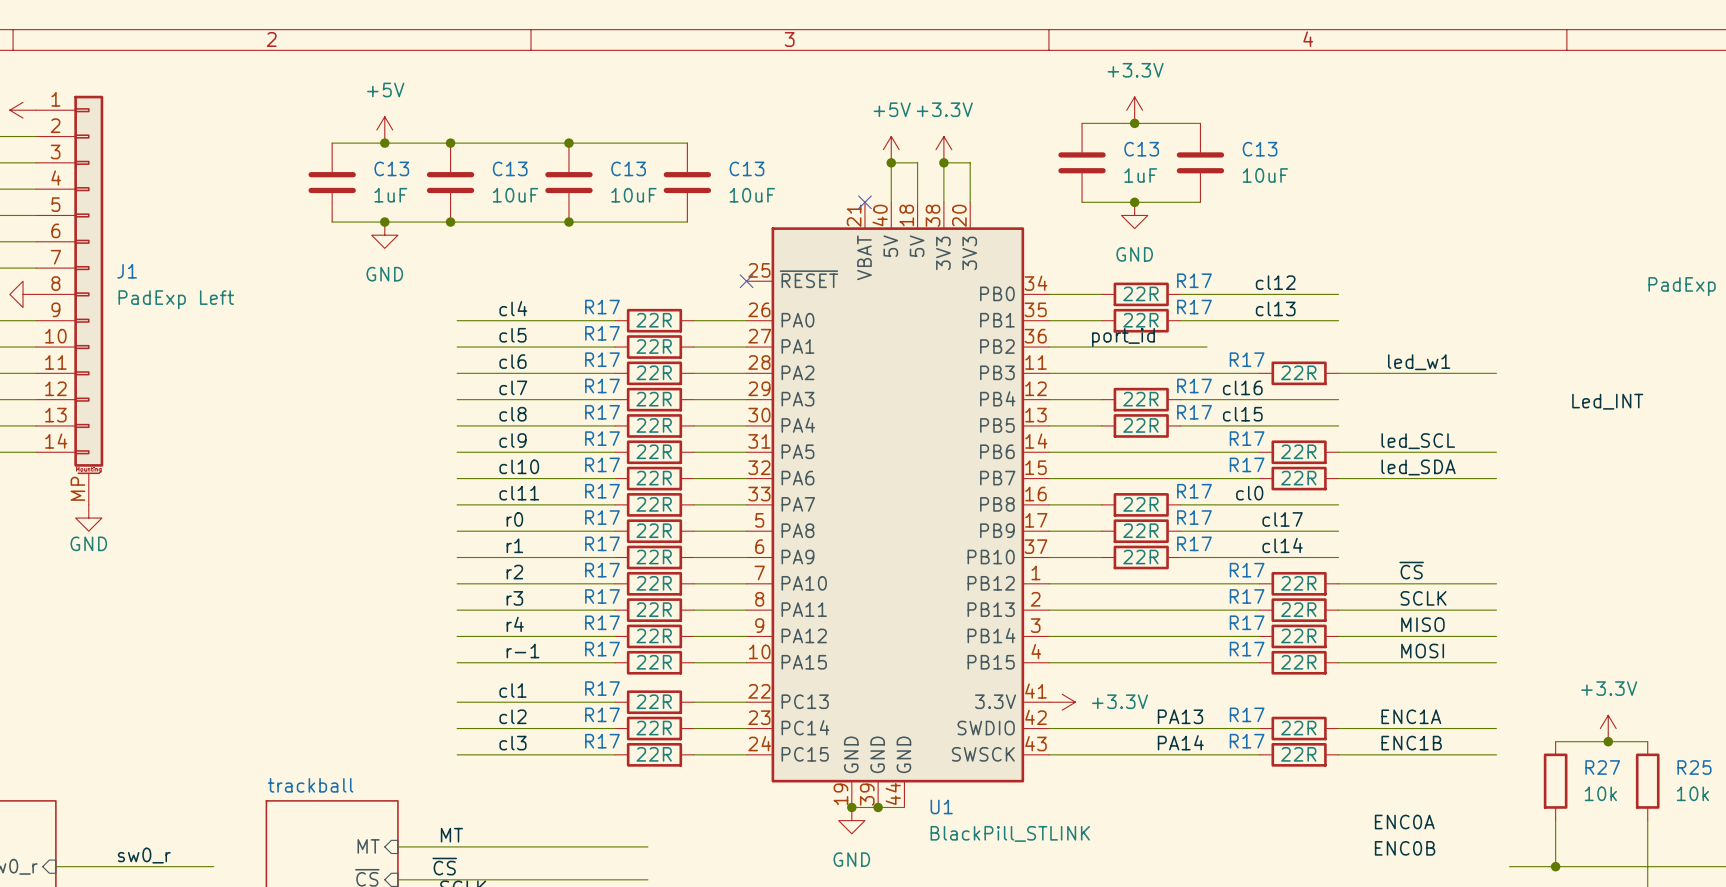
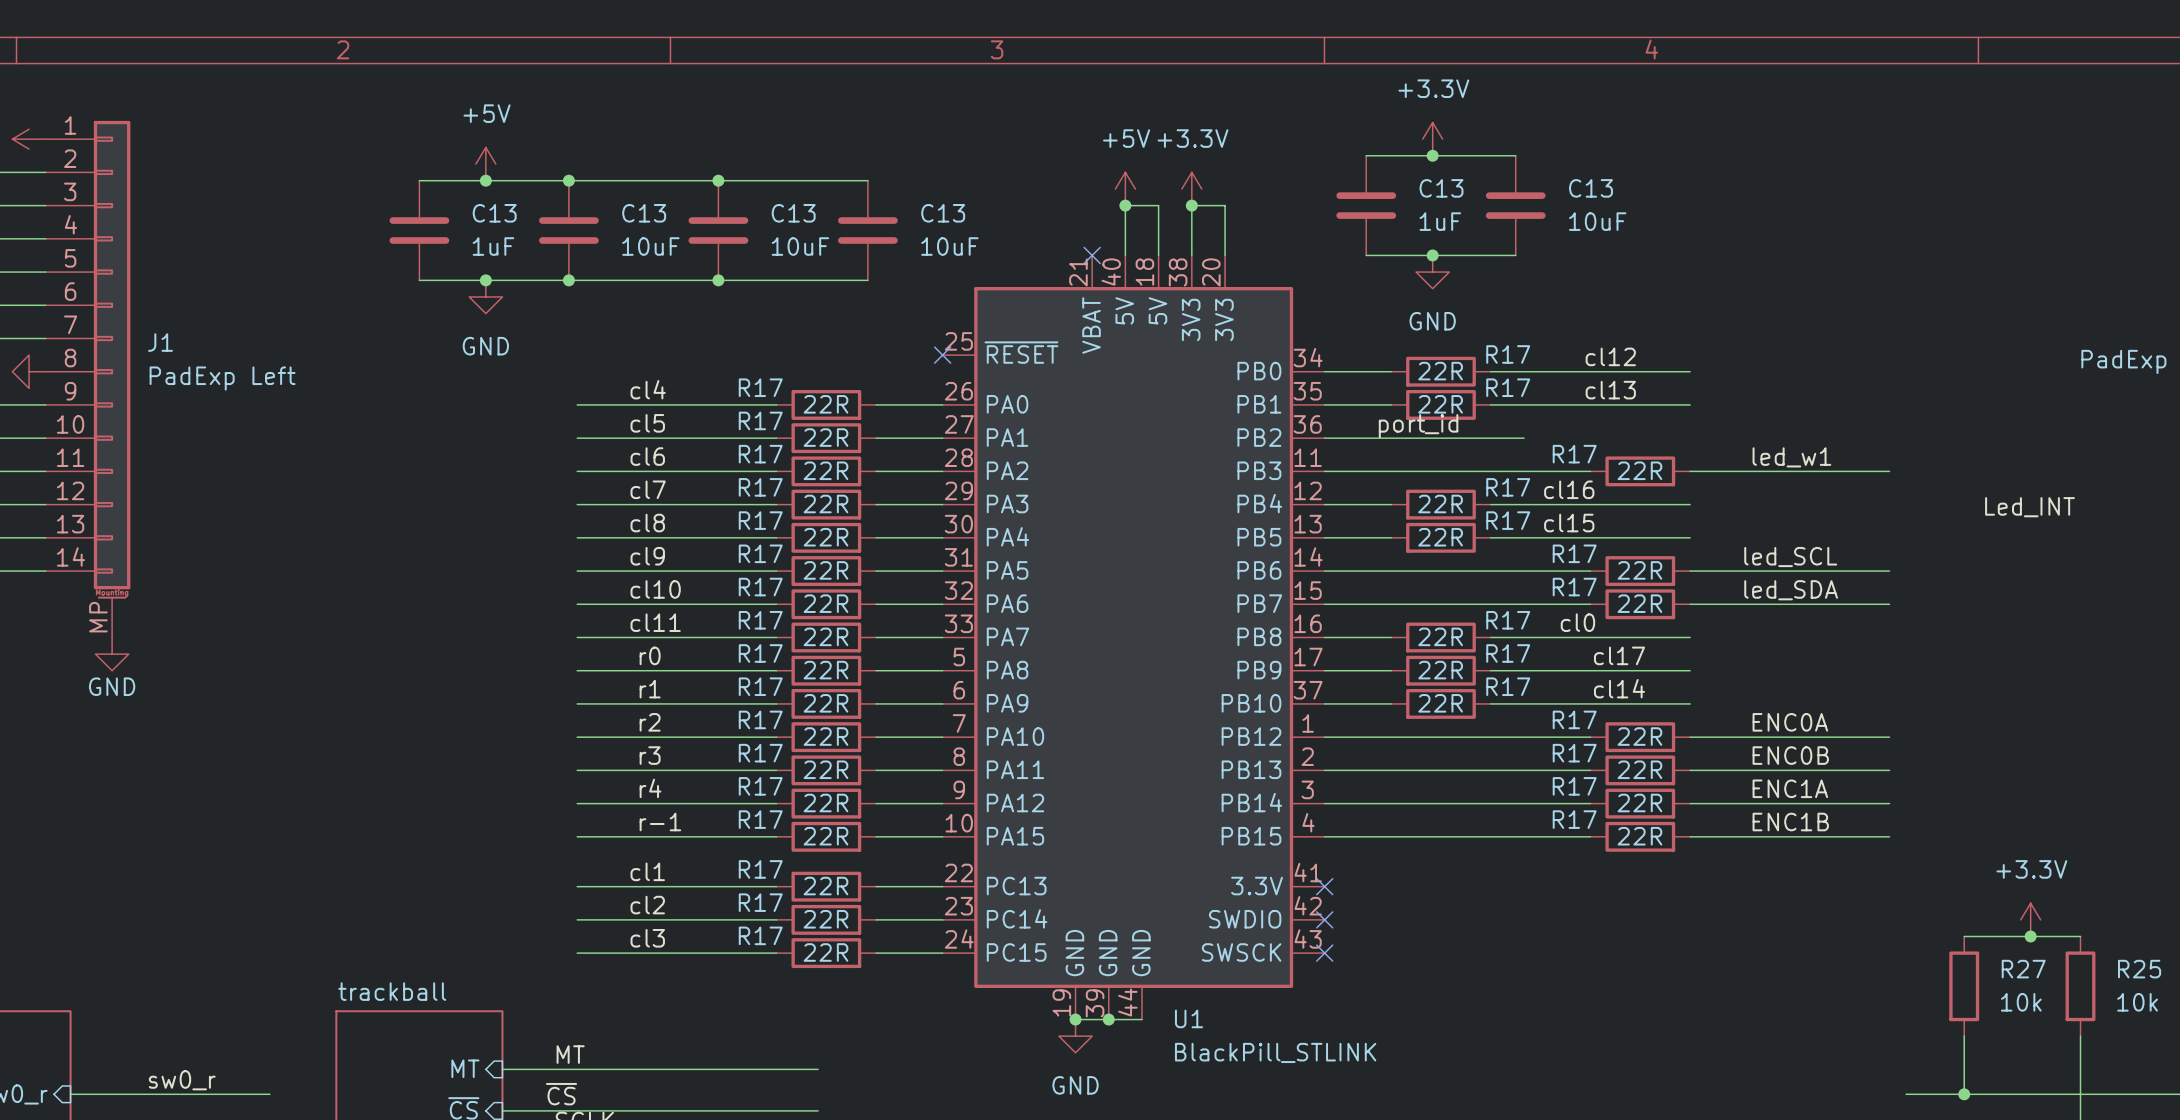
label: ~{CS} (1411, 570) -> none
label: SCLK (1423, 598) -> none
label: MISO (1422, 624) -> none
label: MOSI (1422, 651) -> none
no-connect mark: none -> (1324, 886)
power symbol: +3.3V (1062, 702) -> none
label: PA13 (1180, 716) -> none
label position: ENC1A (1411, 716) -> ENC1A (1790, 788)
wire: (1049, 728) (1259, 728) -> none
no-connect mark: none -> (1324, 919)
R17: 22R (1299, 728) -> none
wire: (1338, 728) (1496, 728) -> none
label: PA14 (1180, 742) -> none
label position: ENC1B (1411, 743) -> ENC1B (1790, 822)
wire: (1049, 754) (1259, 754) -> none
no-connect mark: none -> (1324, 953)
R17: 22R (1299, 754) -> none
wire: (1338, 754) (1496, 754) -> none
label position: ENC0A (1404, 822) -> ENC0A (1790, 722)
label position: ENC0B (1405, 848) -> ENC0B (1790, 755)

